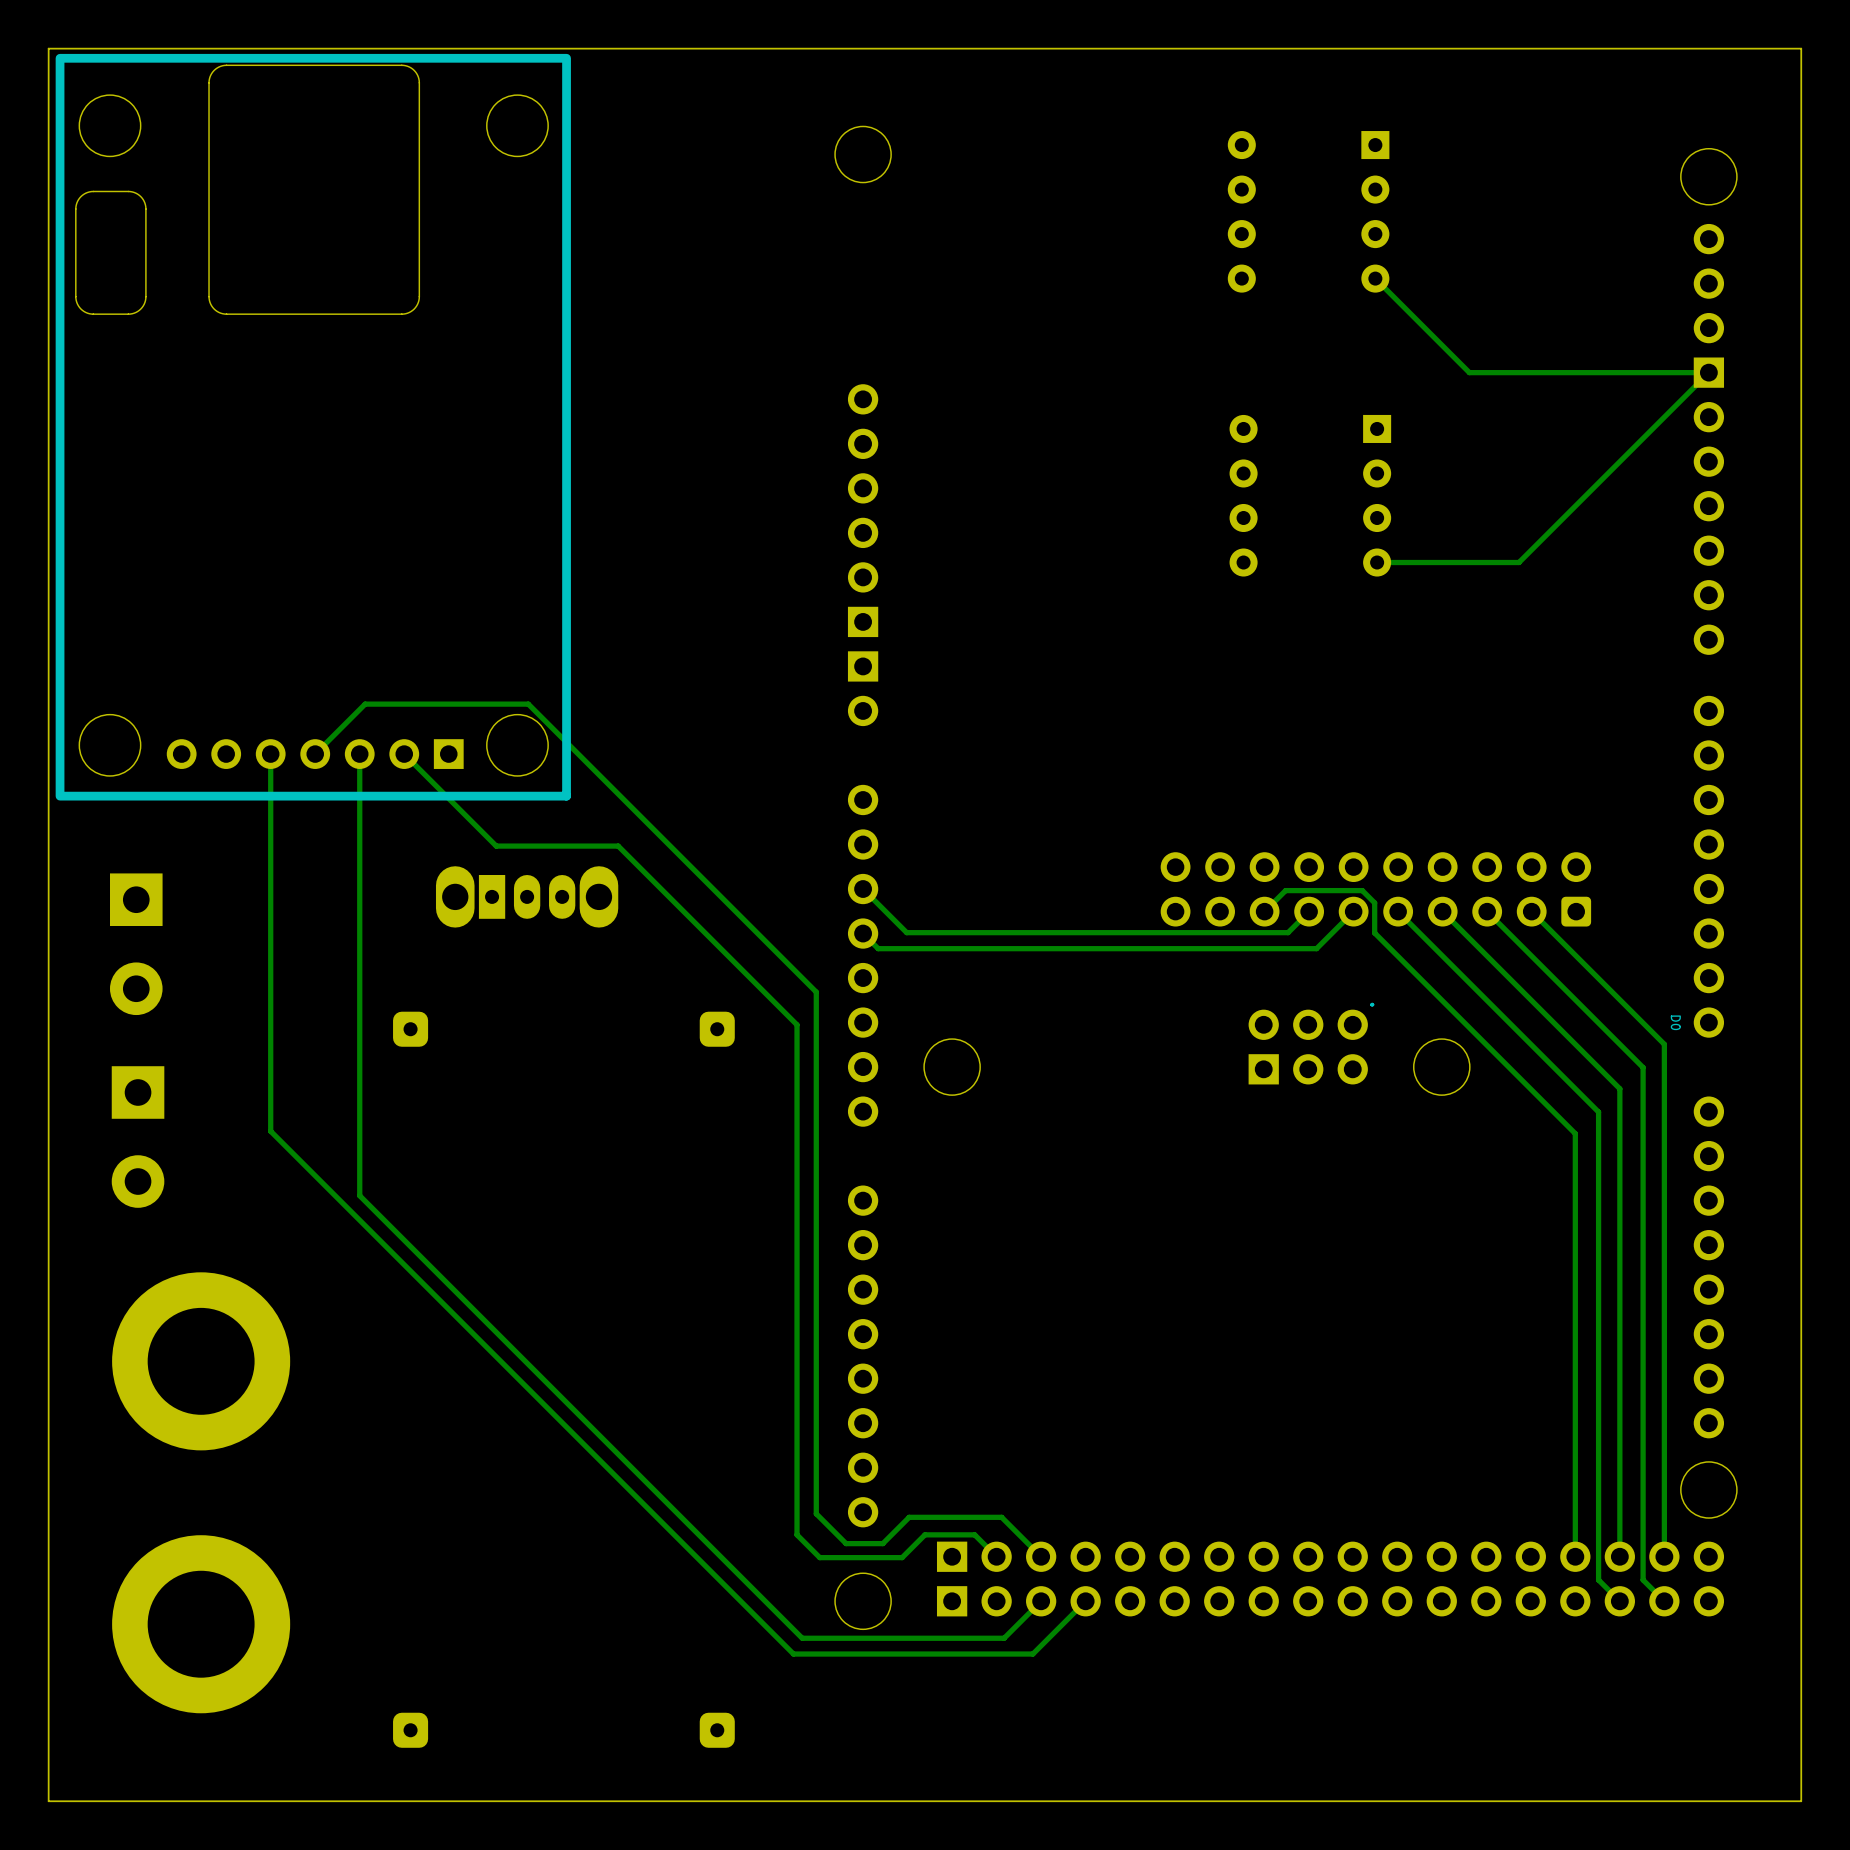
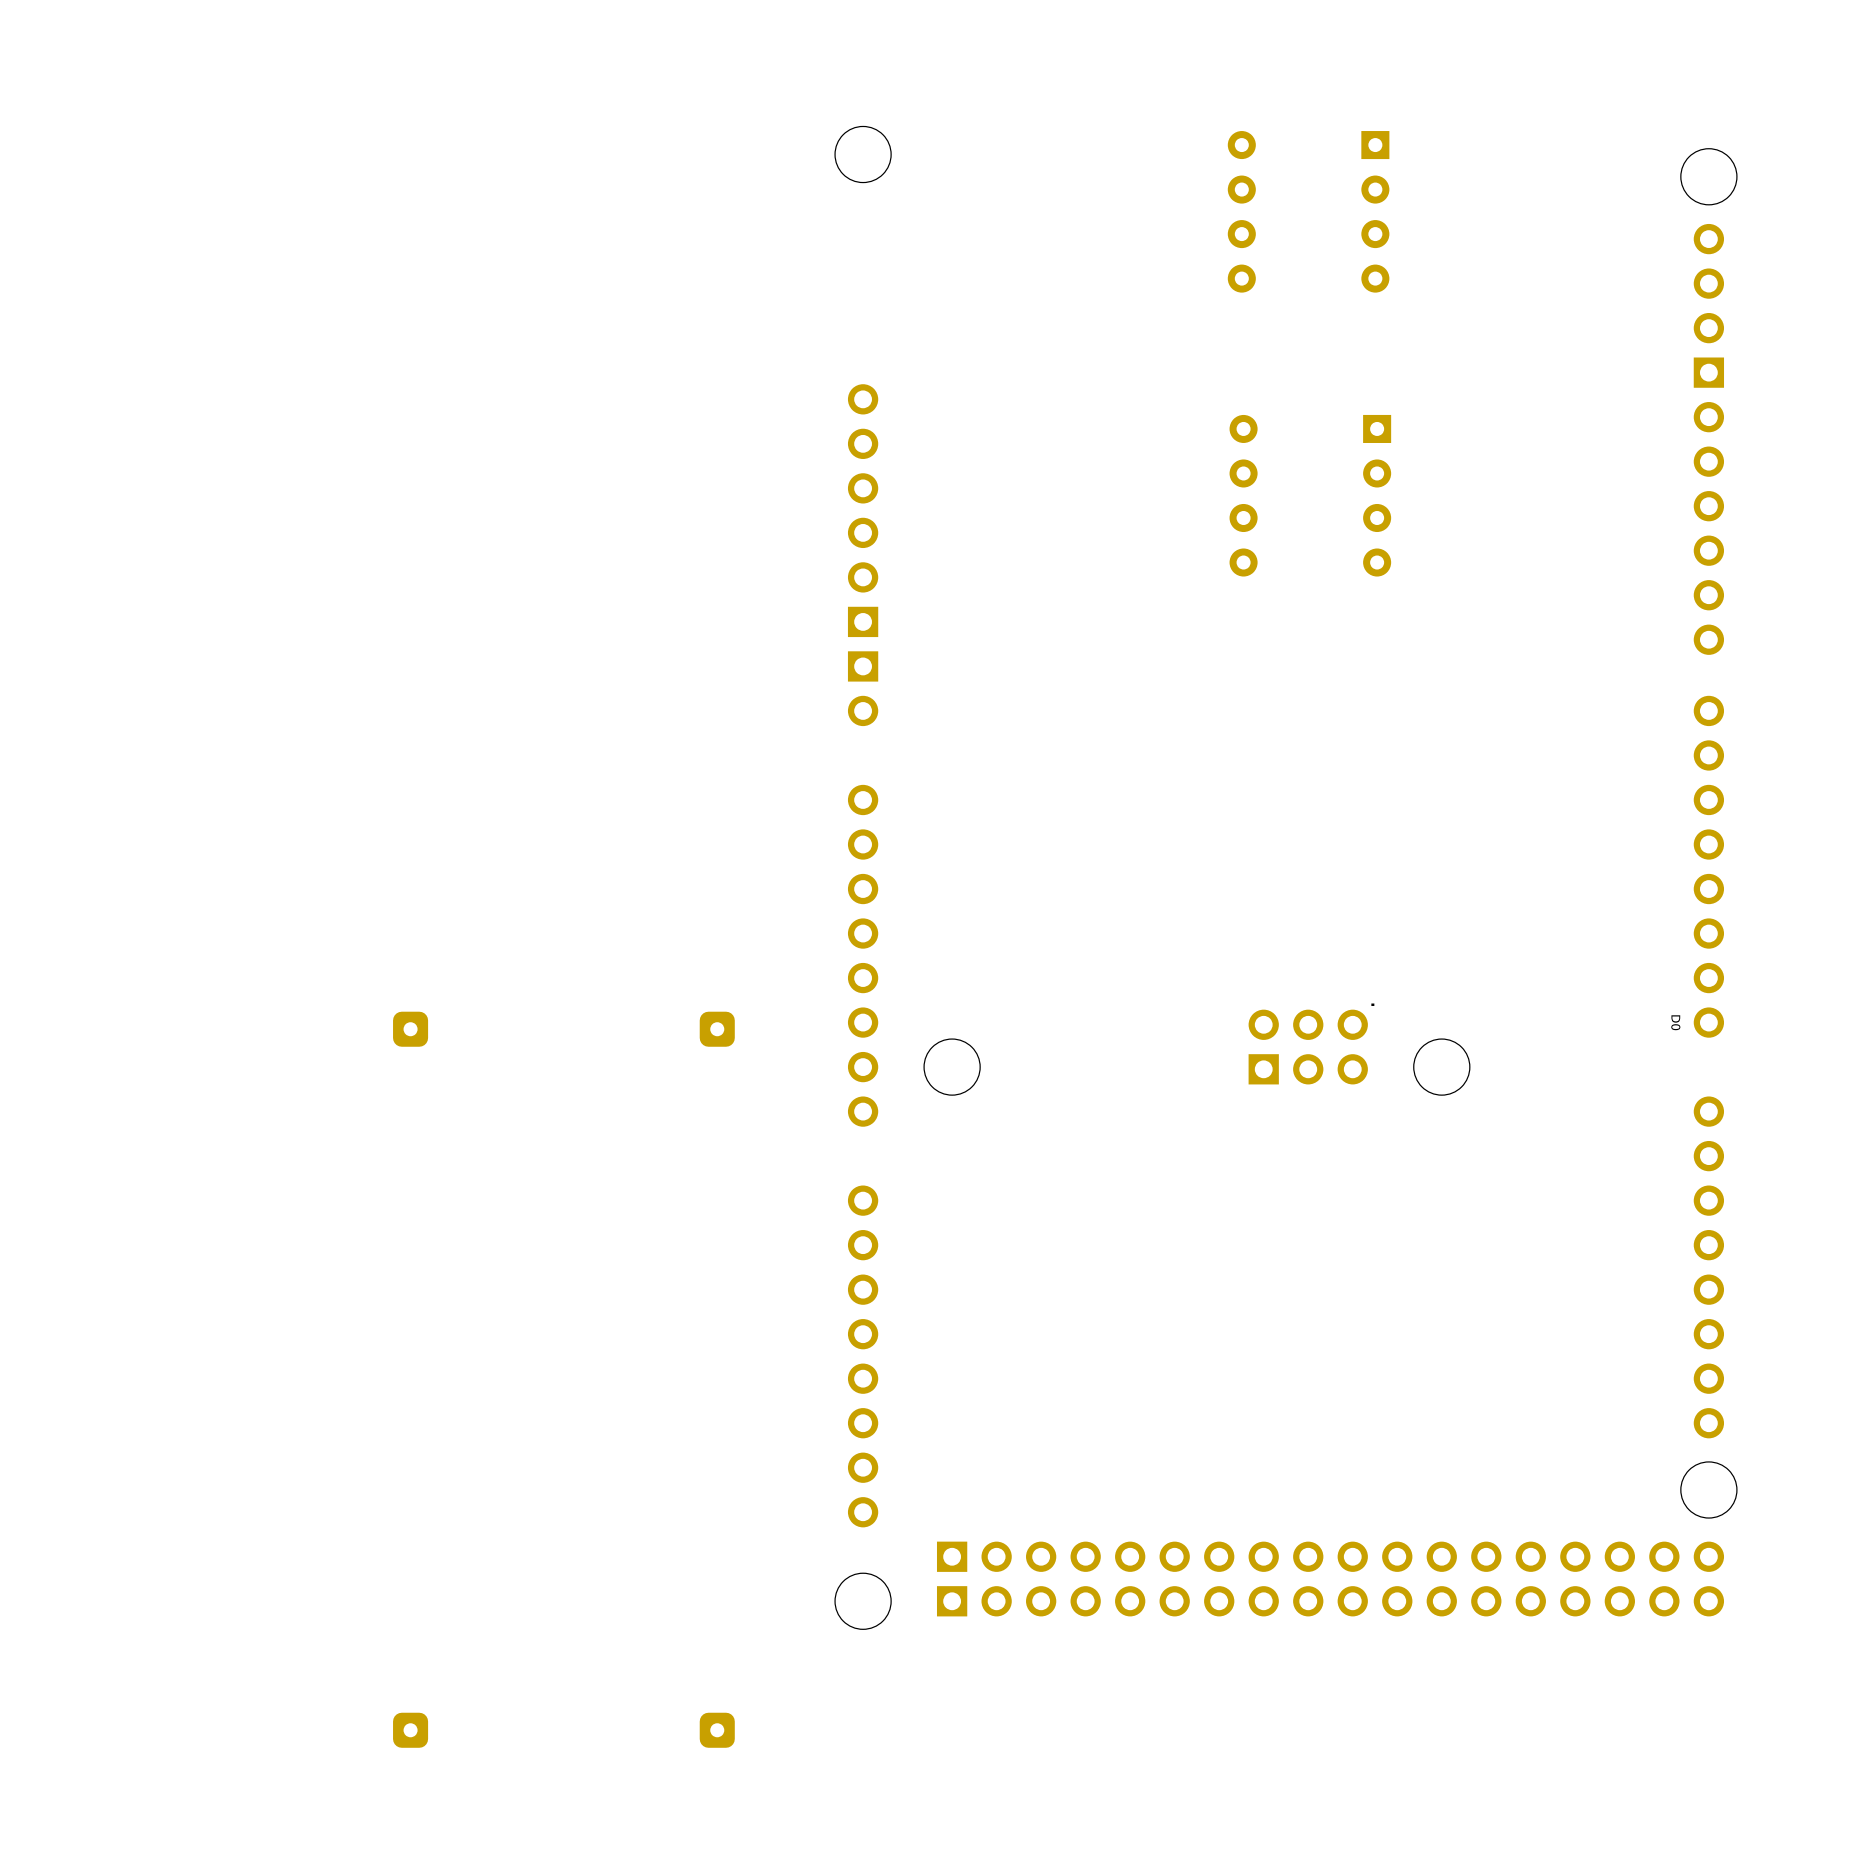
board edge: (1801, 48) (48, 48) (48, 1801) (1801, 1801) (1801, 48) -> none
track: (1375, 278) (1469, 372) (1708, 372) (1519, 562) (1377, 562) -> none
part: (313, 427) -> none
track: (270, 754) (270, 1131) (793, 1654) (1032, 1654) (1085, 1601) -> none
track: (315, 754) (365, 704) (528, 704) (816, 992) (816, 1513) (846, 1543) (882, 1543) (909, 1517) (1001, 1517) (1041, 1556) -> none
track: (359, 754) (359, 1195) (802, 1638) (1004, 1638) (1041, 1601) -> none
track: (404, 754) (496, 846) (618, 846) (797, 1024) (797, 1534) (819, 1557) (902, 1557) (924, 1534) (974, 1534) (996, 1556) -> none
track: (863, 889) (906, 932) (1288, 932) (1309, 911) -> none
part: (1375, 889) -> none
part: (527, 896) -> none
track: (1264, 911) (1285, 890) (1362, 890) (1374, 902) (1374, 933) (1575, 1133) (1575, 1556) -> none
track: (1353, 911) (1316, 948) (878, 948) (863, 933) -> none
track: (1398, 911) (1598, 1112) (1598, 1580) (1619, 1601) -> none
track: (1442, 911) (1619, 1088) (1619, 1556) -> none
track: (1487, 911) (1643, 1067) (1643, 1580) (1664, 1601) -> none
track: (1531, 911) (1664, 1044) (1664, 1556) -> none
part: (136, 944) -> none
part: (138, 1137) -> none
part: (201, 1361) -> none
part: (201, 1624) -> none

